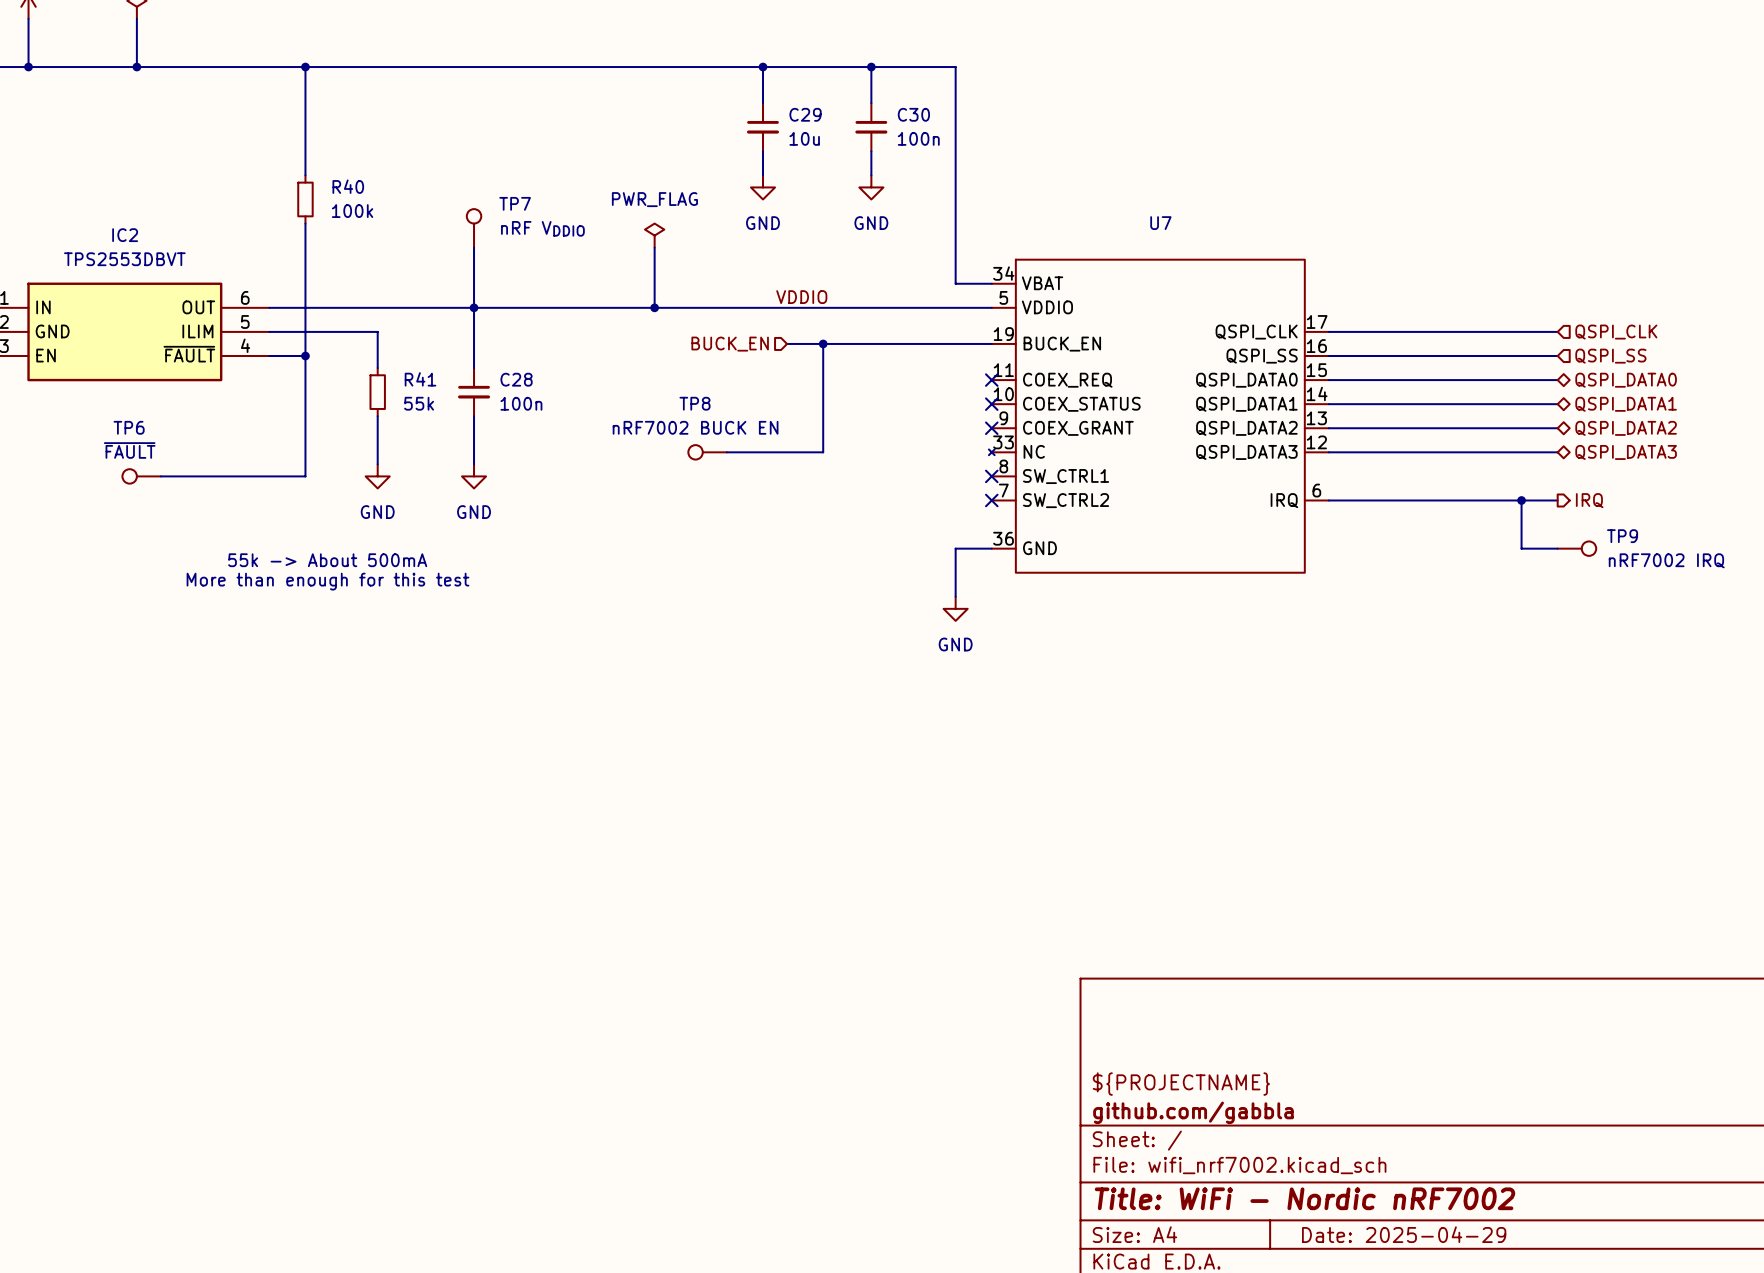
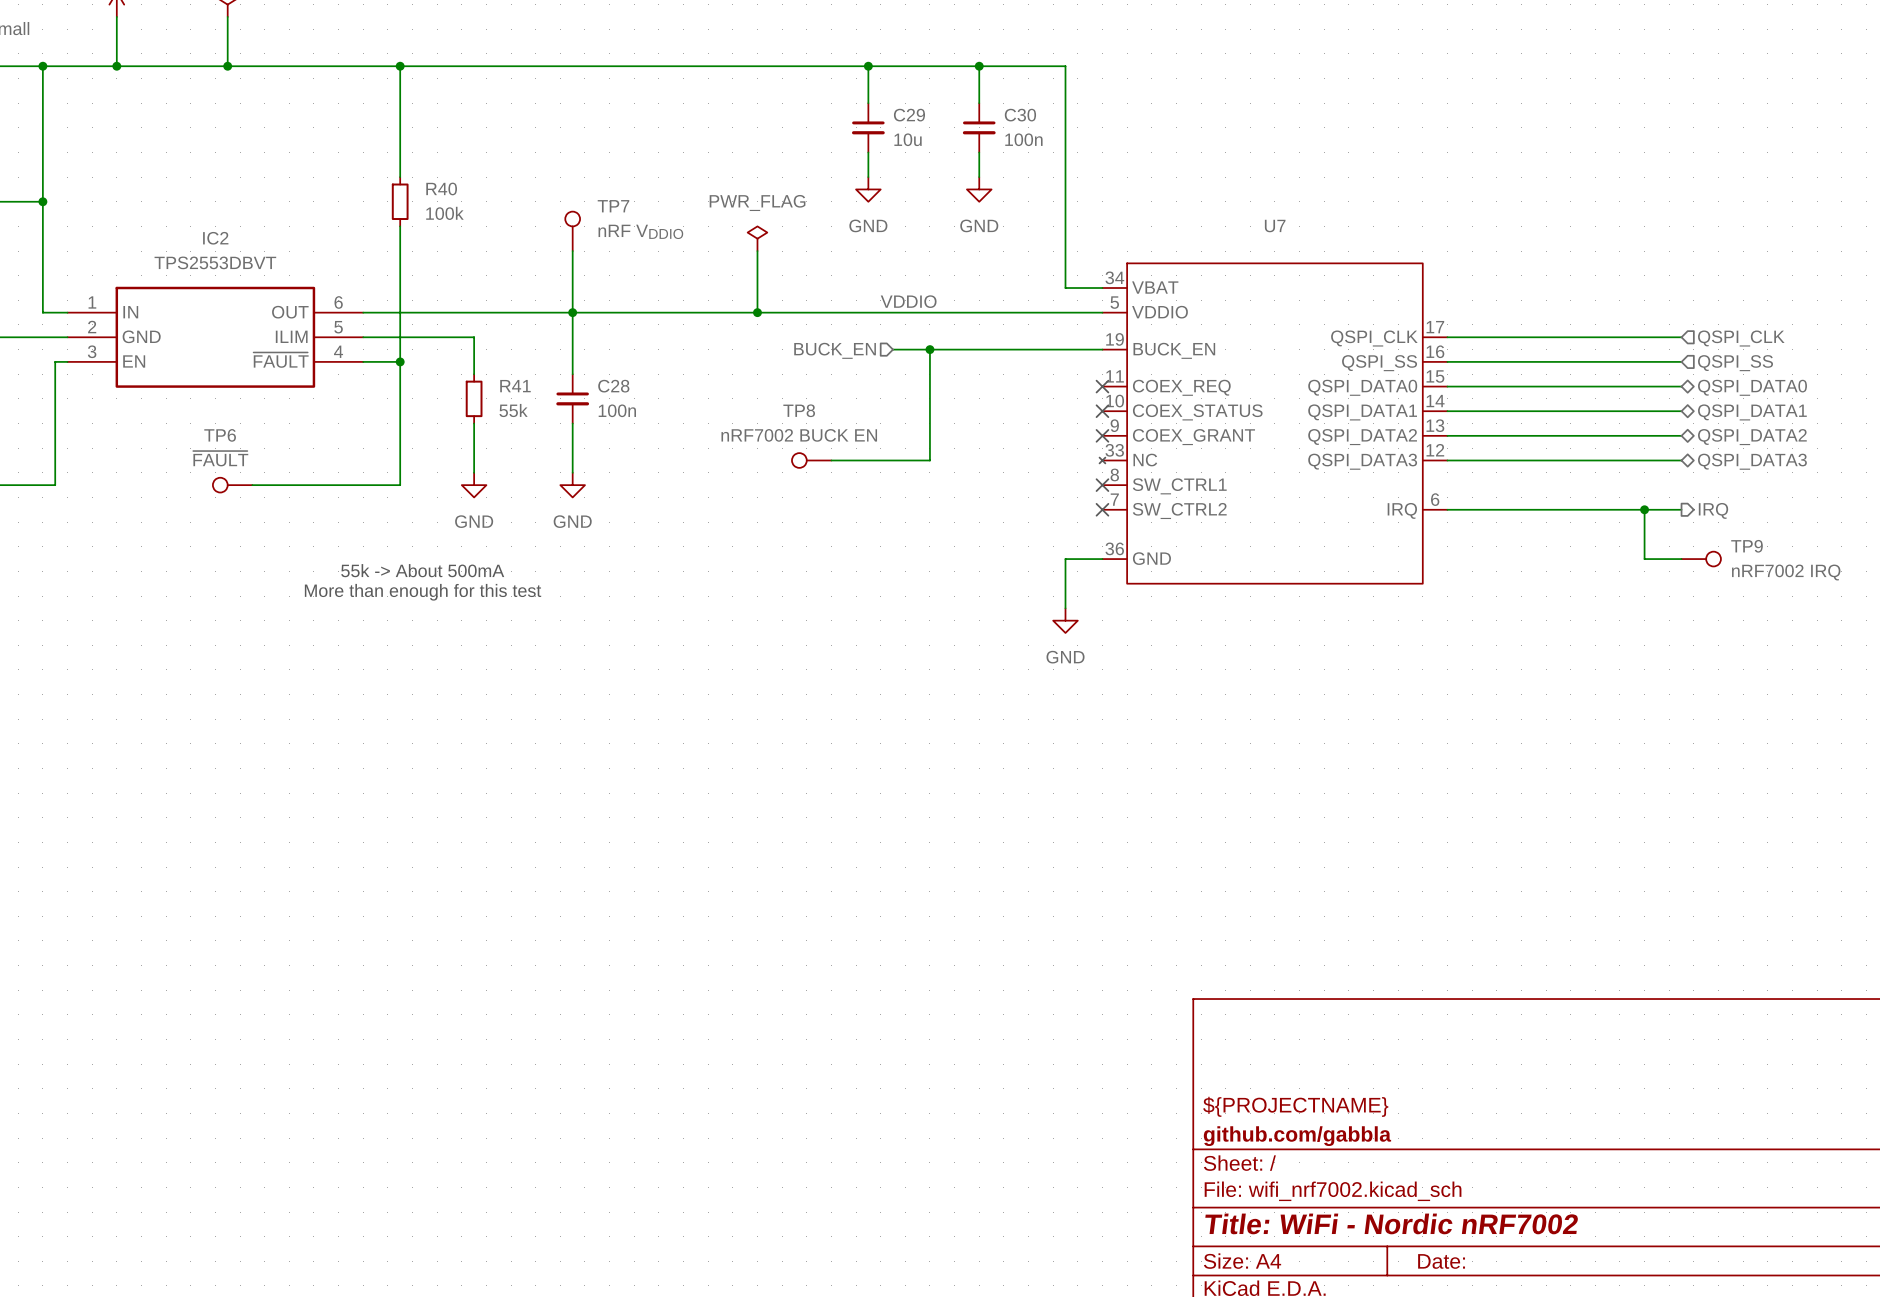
title block: Date: 2025-04-29 (1404, 1234) -> Date: (1441, 1261)

